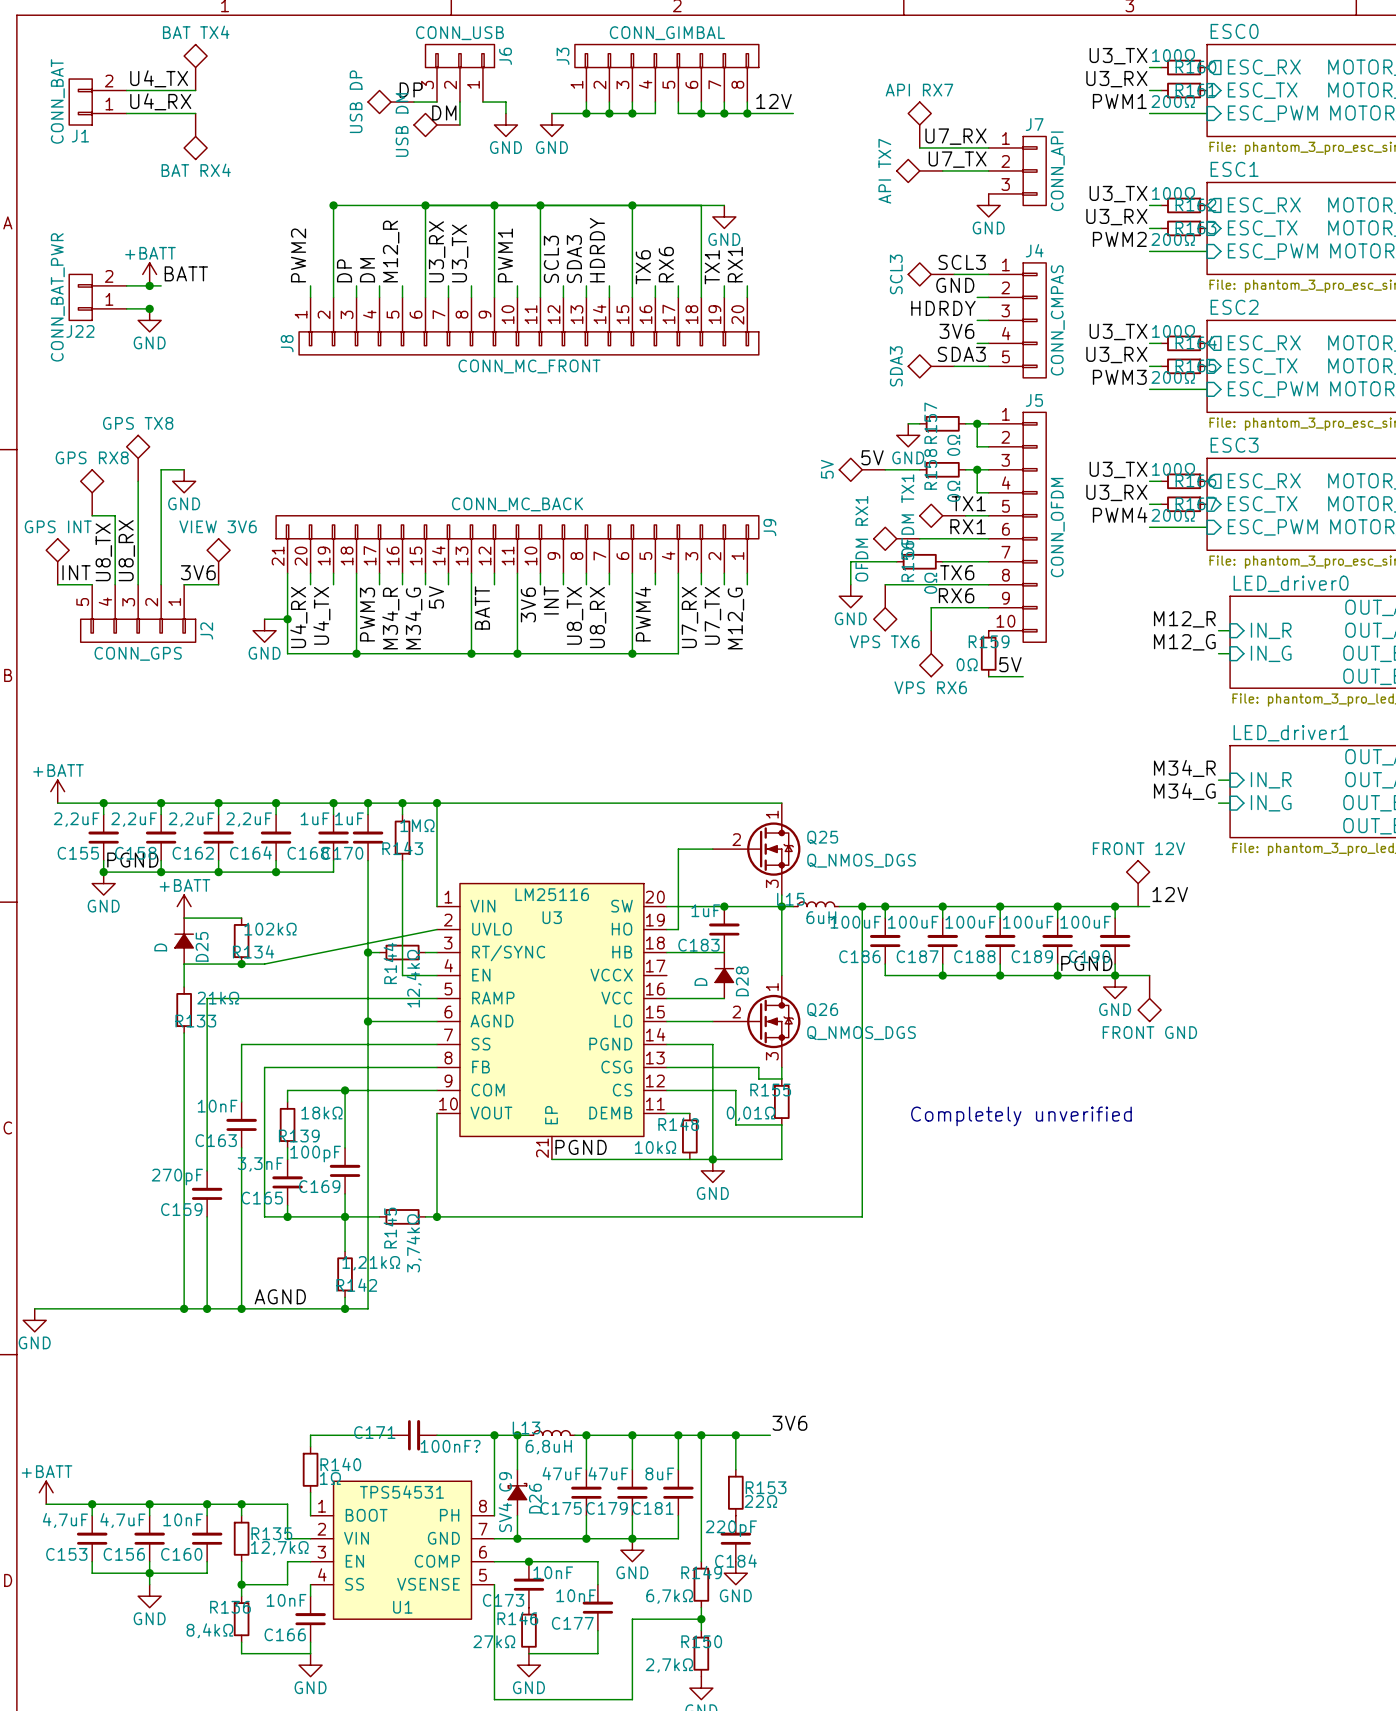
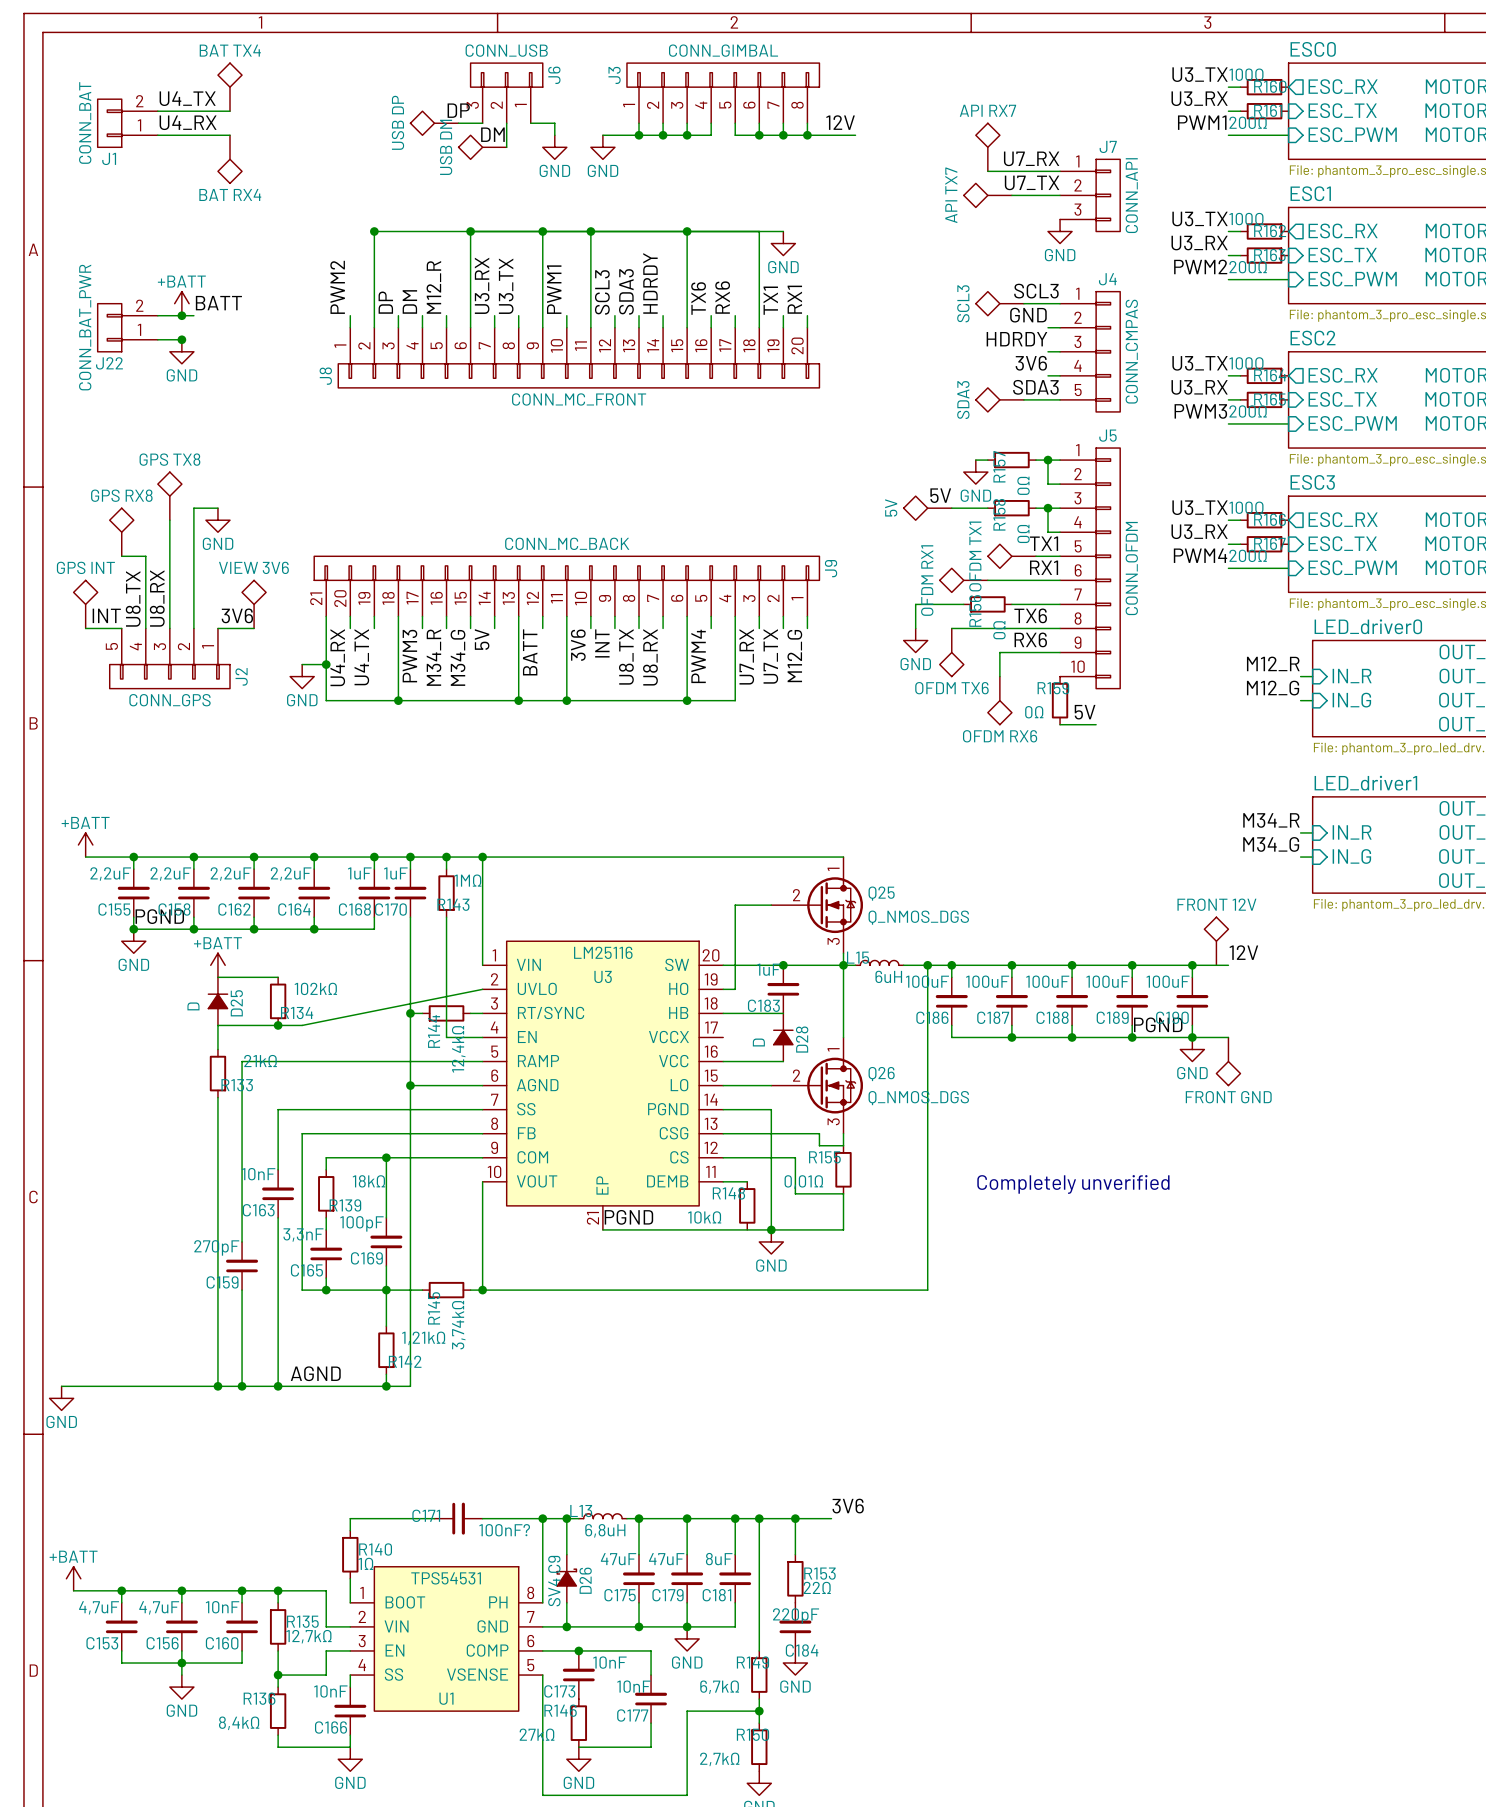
part value: VPS TX6 (884, 641) -> OFDM TX6 (951, 688)
part value: VPS RX6 (930, 687) -> OFDM RX6 (1000, 736)

